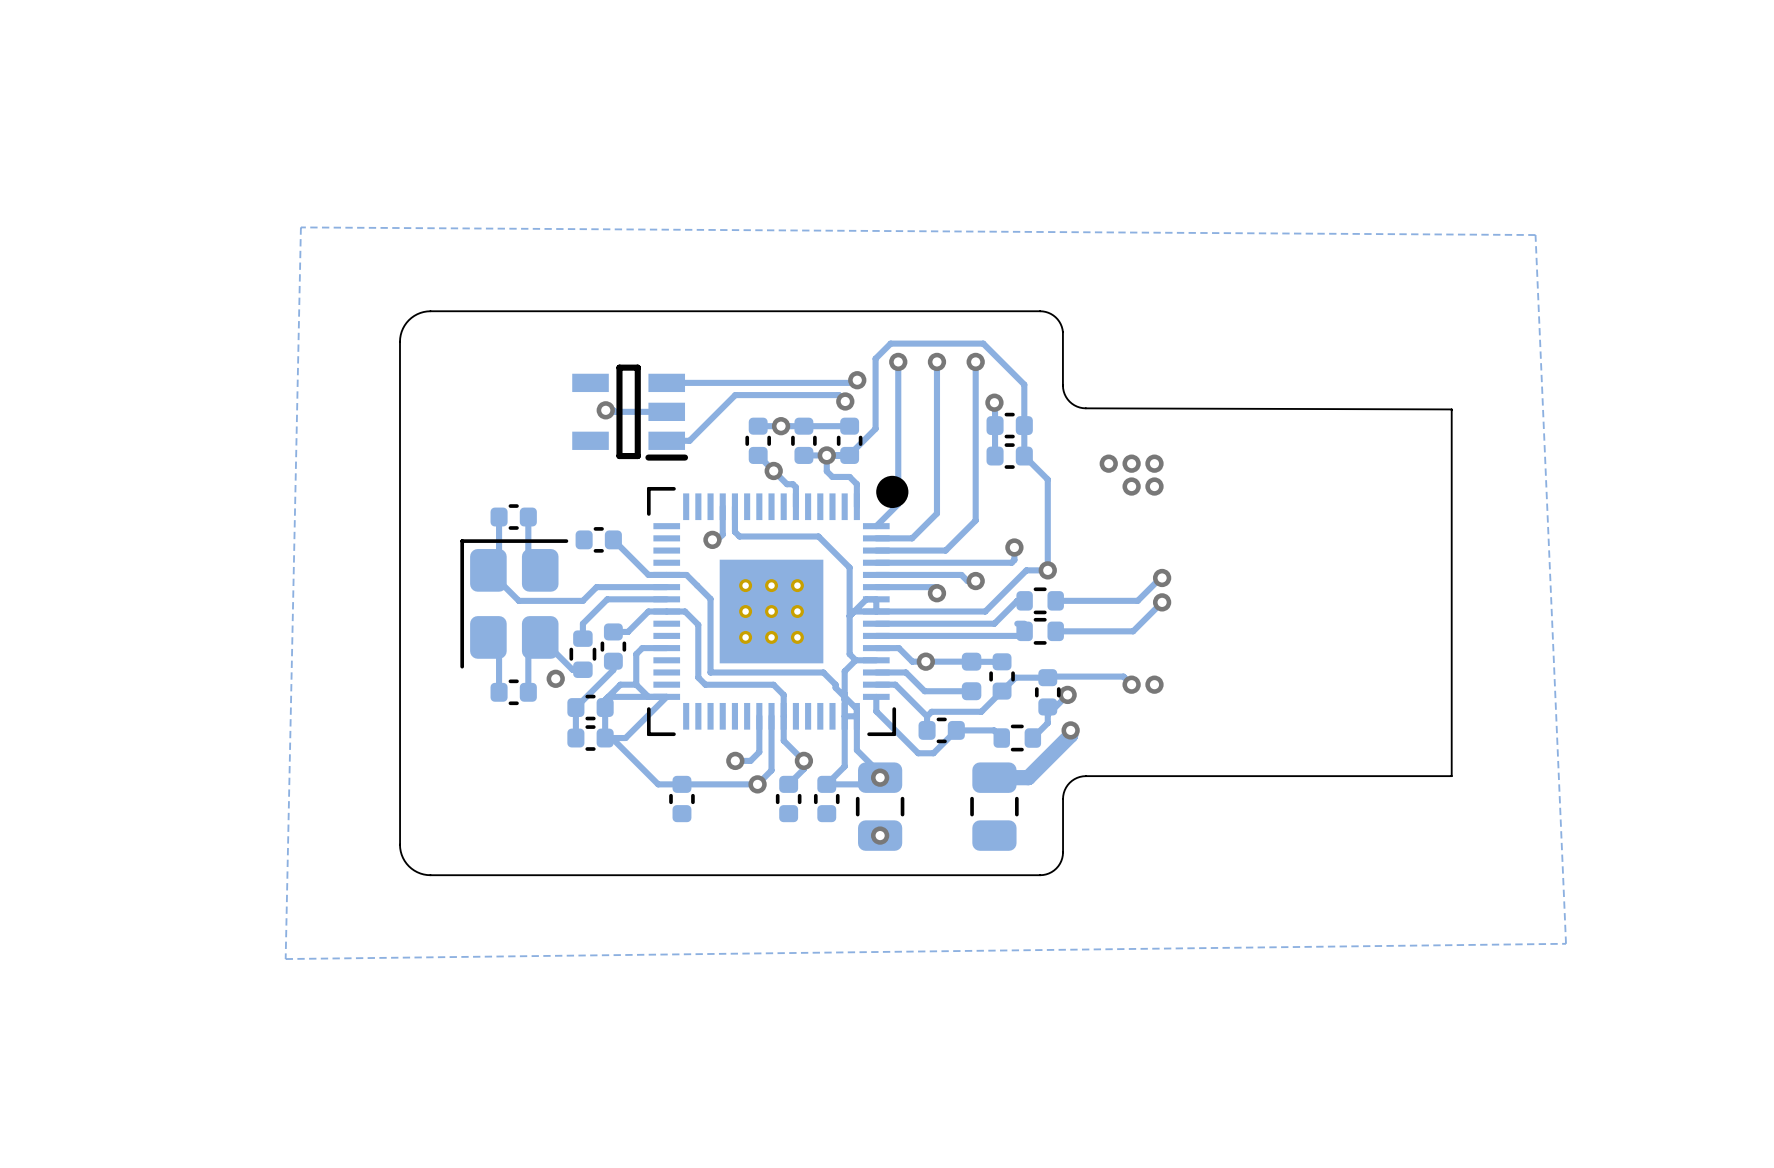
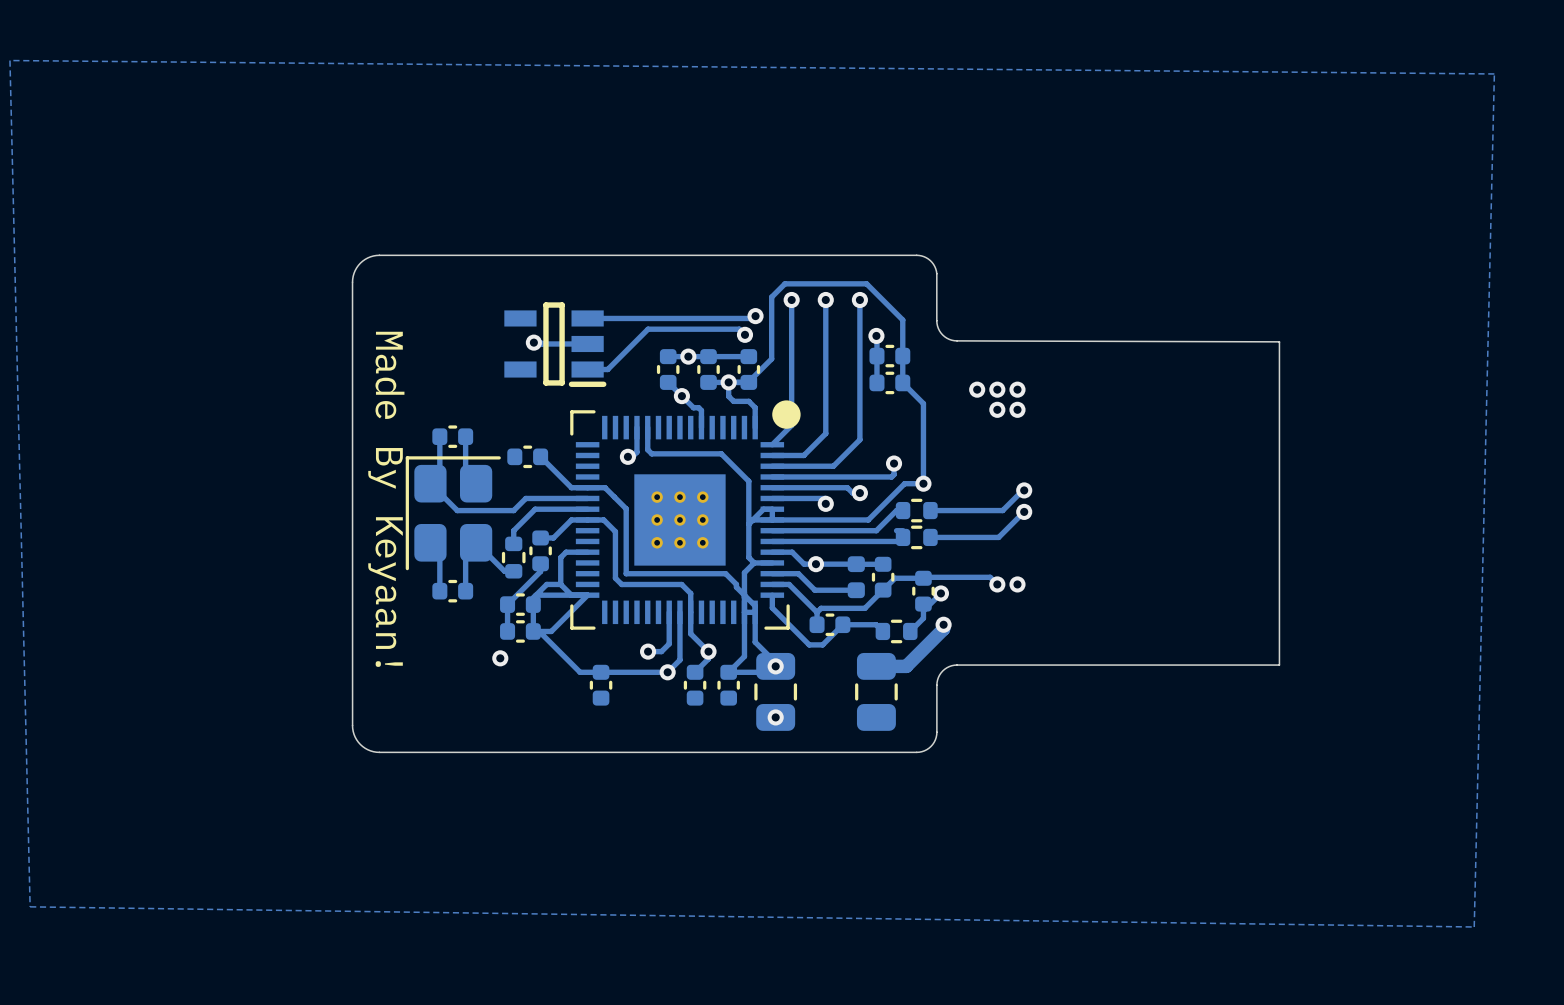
zone outline: (300, 227) (1535, 235) (1566, 943) (285, 959) (300, 227) -> (9, 60) (1494, 73) (1474, 927) (30, 906) (9, 60)
text: none -> Made By Keyaan! (386, 499)
via position: (555, 678) -> (500, 658)

